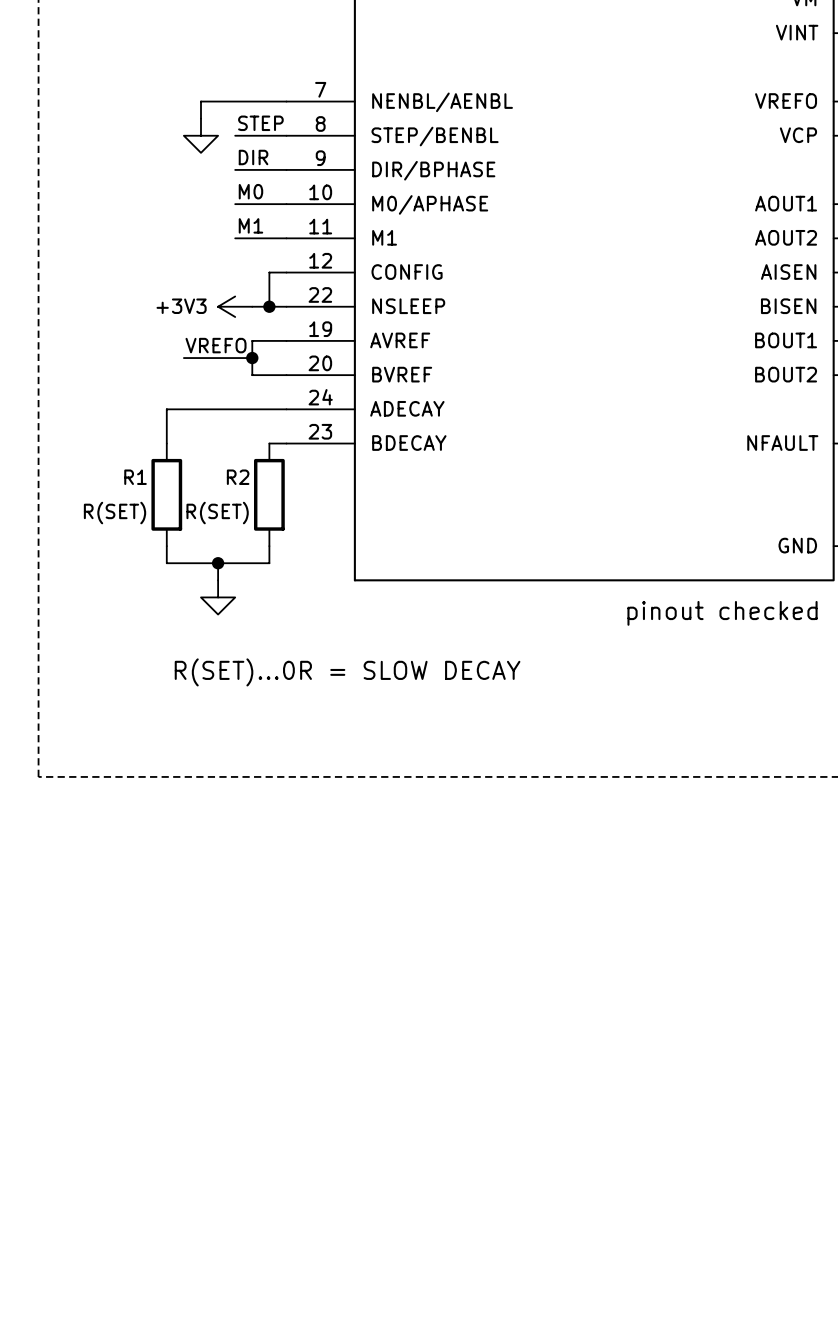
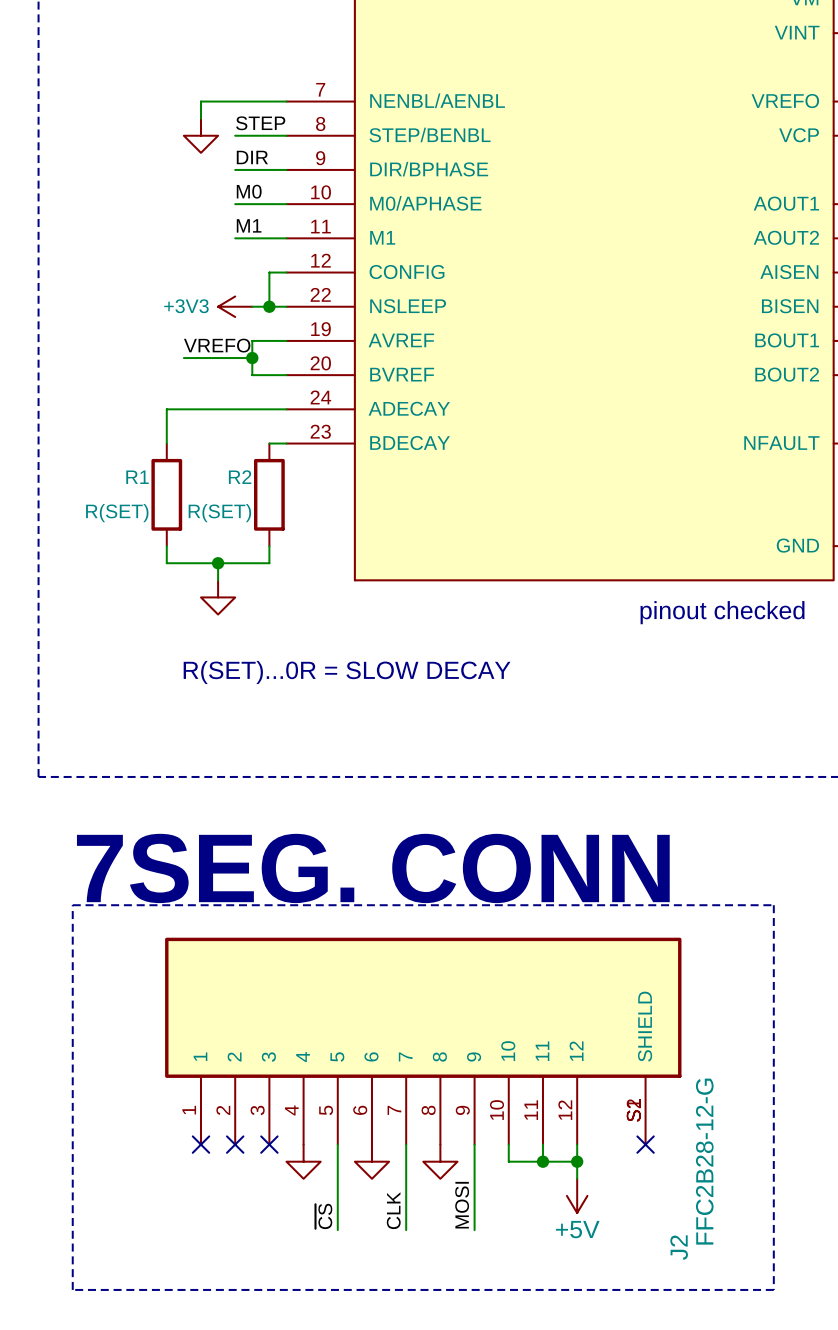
text: none -> 7SEG. CONN (373, 868)
line: none -> (72, 905) (773, 905) (773, 1289) (72, 1289) (72, 905)
J2: none -> FFC2B28-12-G (423, 1041)
no-connect mark: none -> (200, 1144)
no-connect mark: none -> (235, 1144)
no-connect mark: none -> (269, 1144)
wire: none -> (337, 1144) (337, 1230)
wire: none -> (406, 1144) (406, 1230)
wire: none -> (474, 1144) (474, 1230)
wire: none -> (508, 1144) (508, 1161) (577, 1161)
wire: none -> (542, 1144) (542, 1161)
wire: none -> (577, 1144) (577, 1178)
no-connect mark: none -> (645, 1144)
power symbol: none -> (303, 1161)
power symbol: none -> (371, 1161)
power symbol: none -> (440, 1161)
junction: none -> (542, 1161)
junction: none -> (577, 1161)
power symbol: none -> +5V (577, 1195)
label: none -> MOSI (462, 1205)
label: none -> CLK (393, 1210)
label: none -> ~{CS} (323, 1216)

